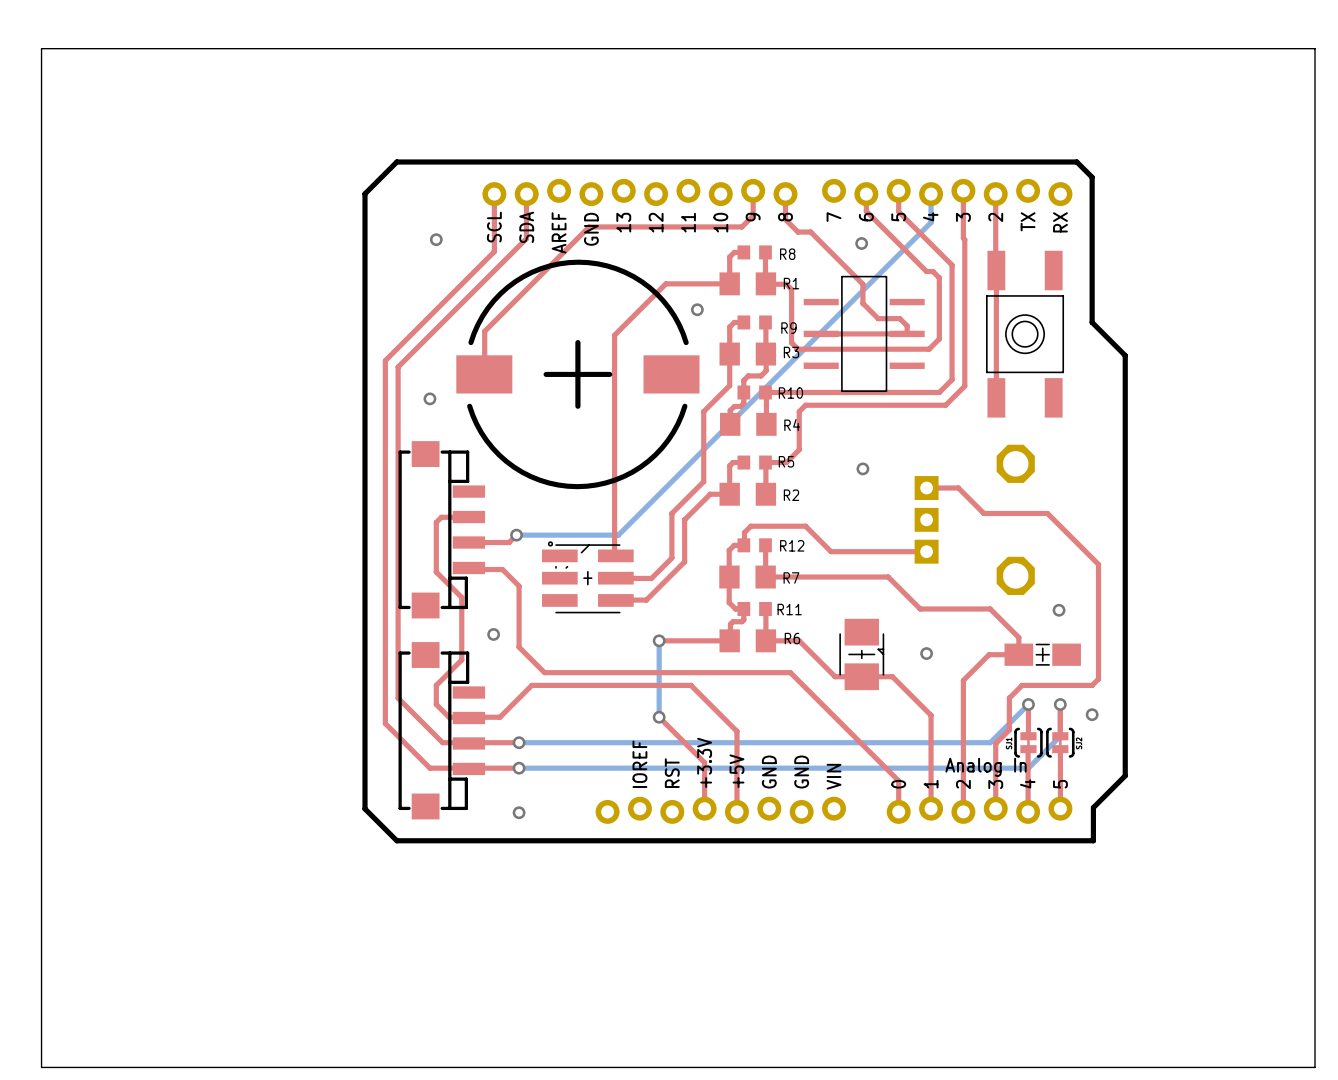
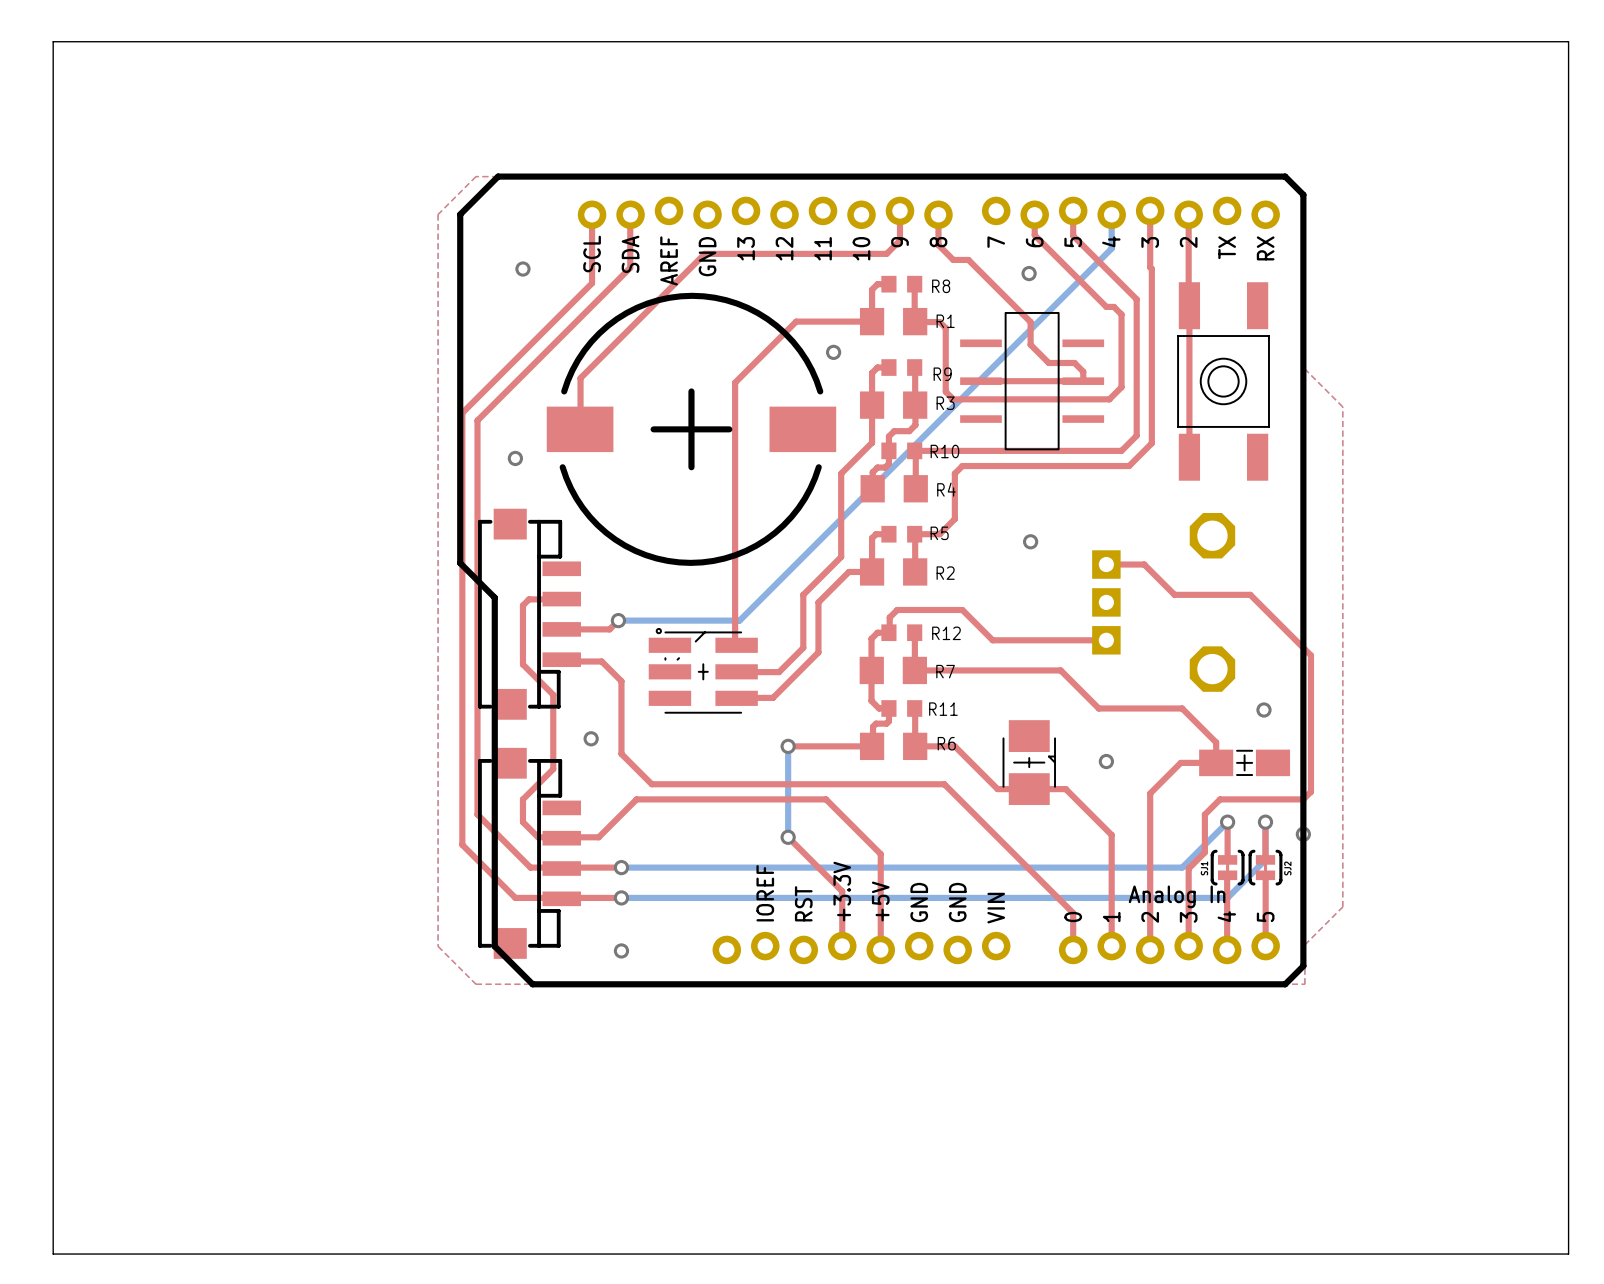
board edge: (415, 162) (396, 162) (365, 193) (365, 808) (396, 840) (444, 840) -> (498, 176) (460, 214) (460, 563) (494, 597) (494, 946) (532, 984)
board edge: (1092, 322) (1125, 355) (1125, 775) (1093, 807) (1093, 840) (1076, 840) -> (1303, 367) (1303, 966) (1285, 984)

